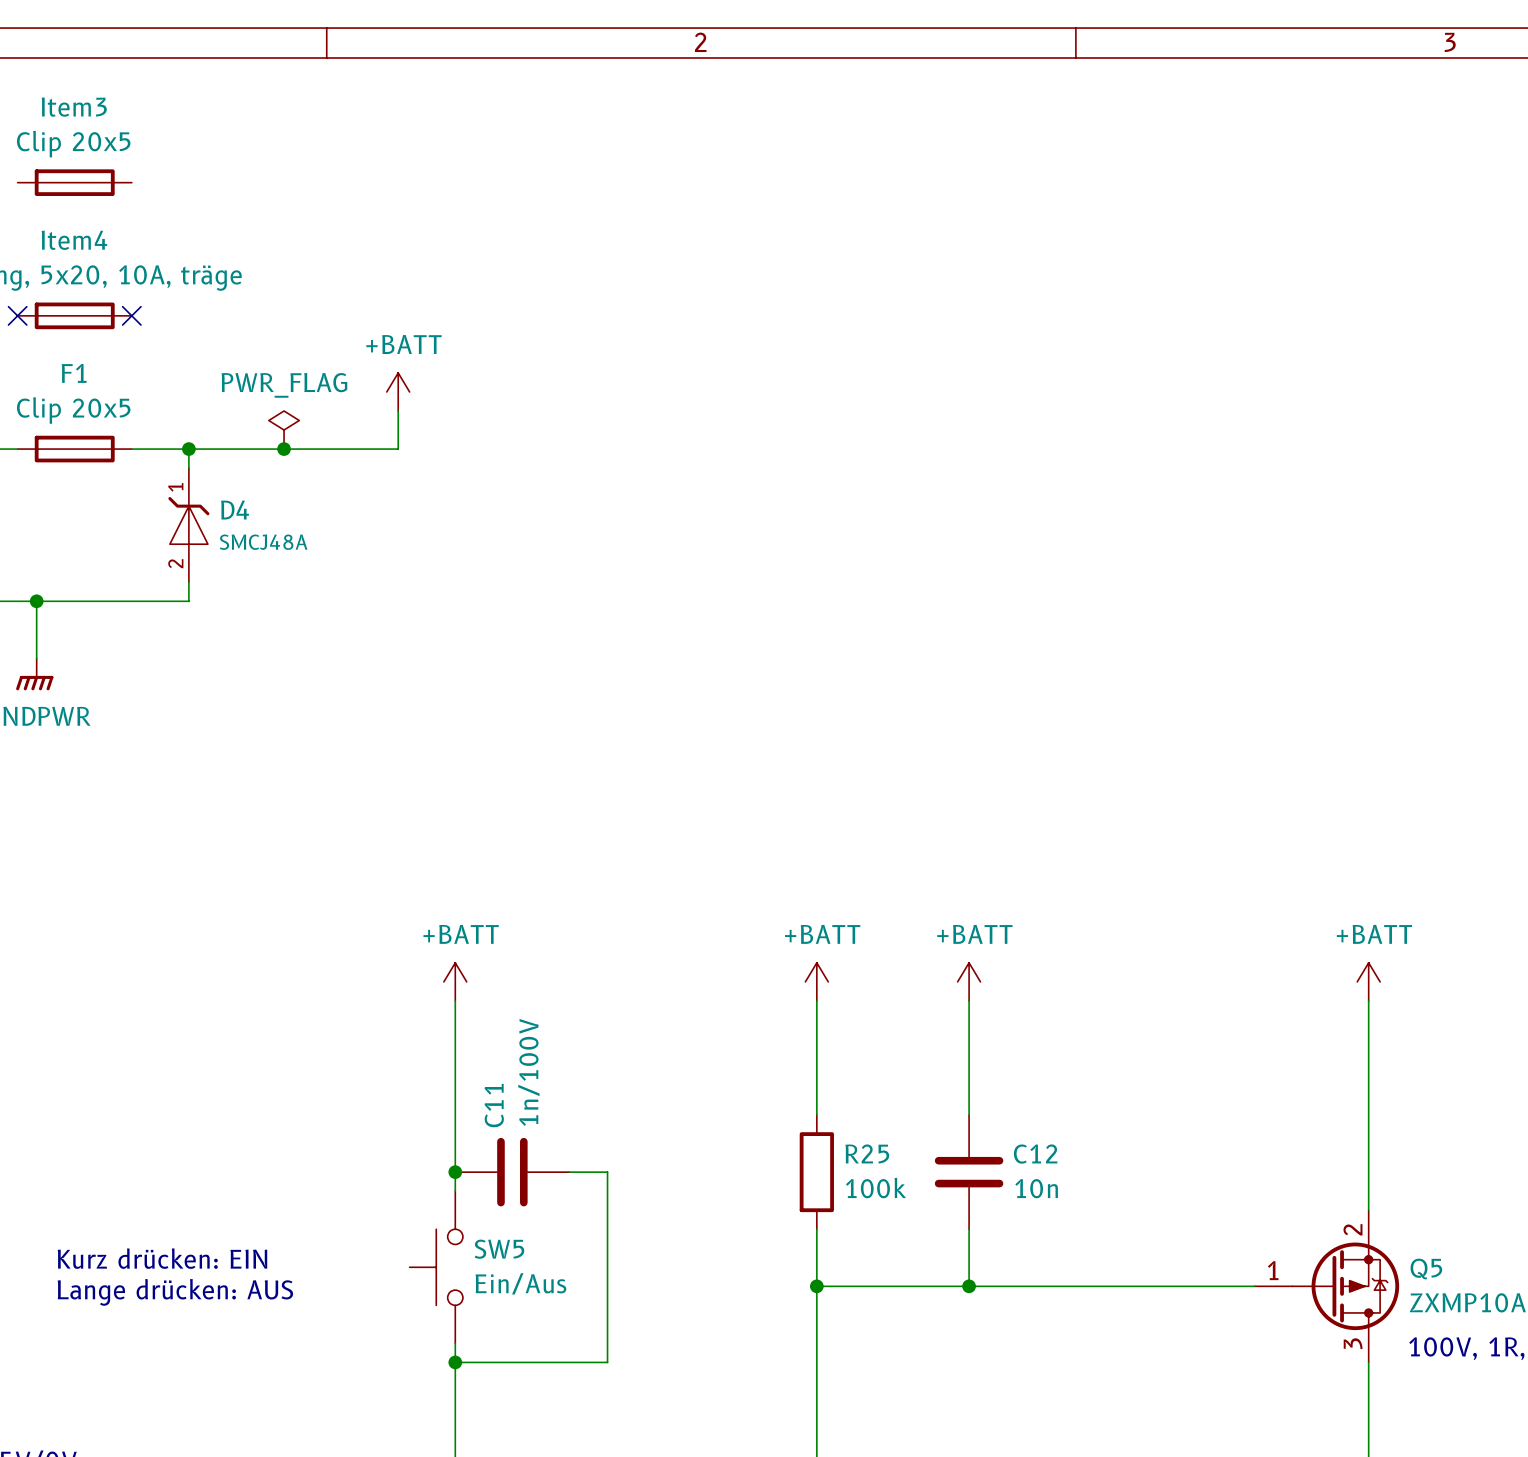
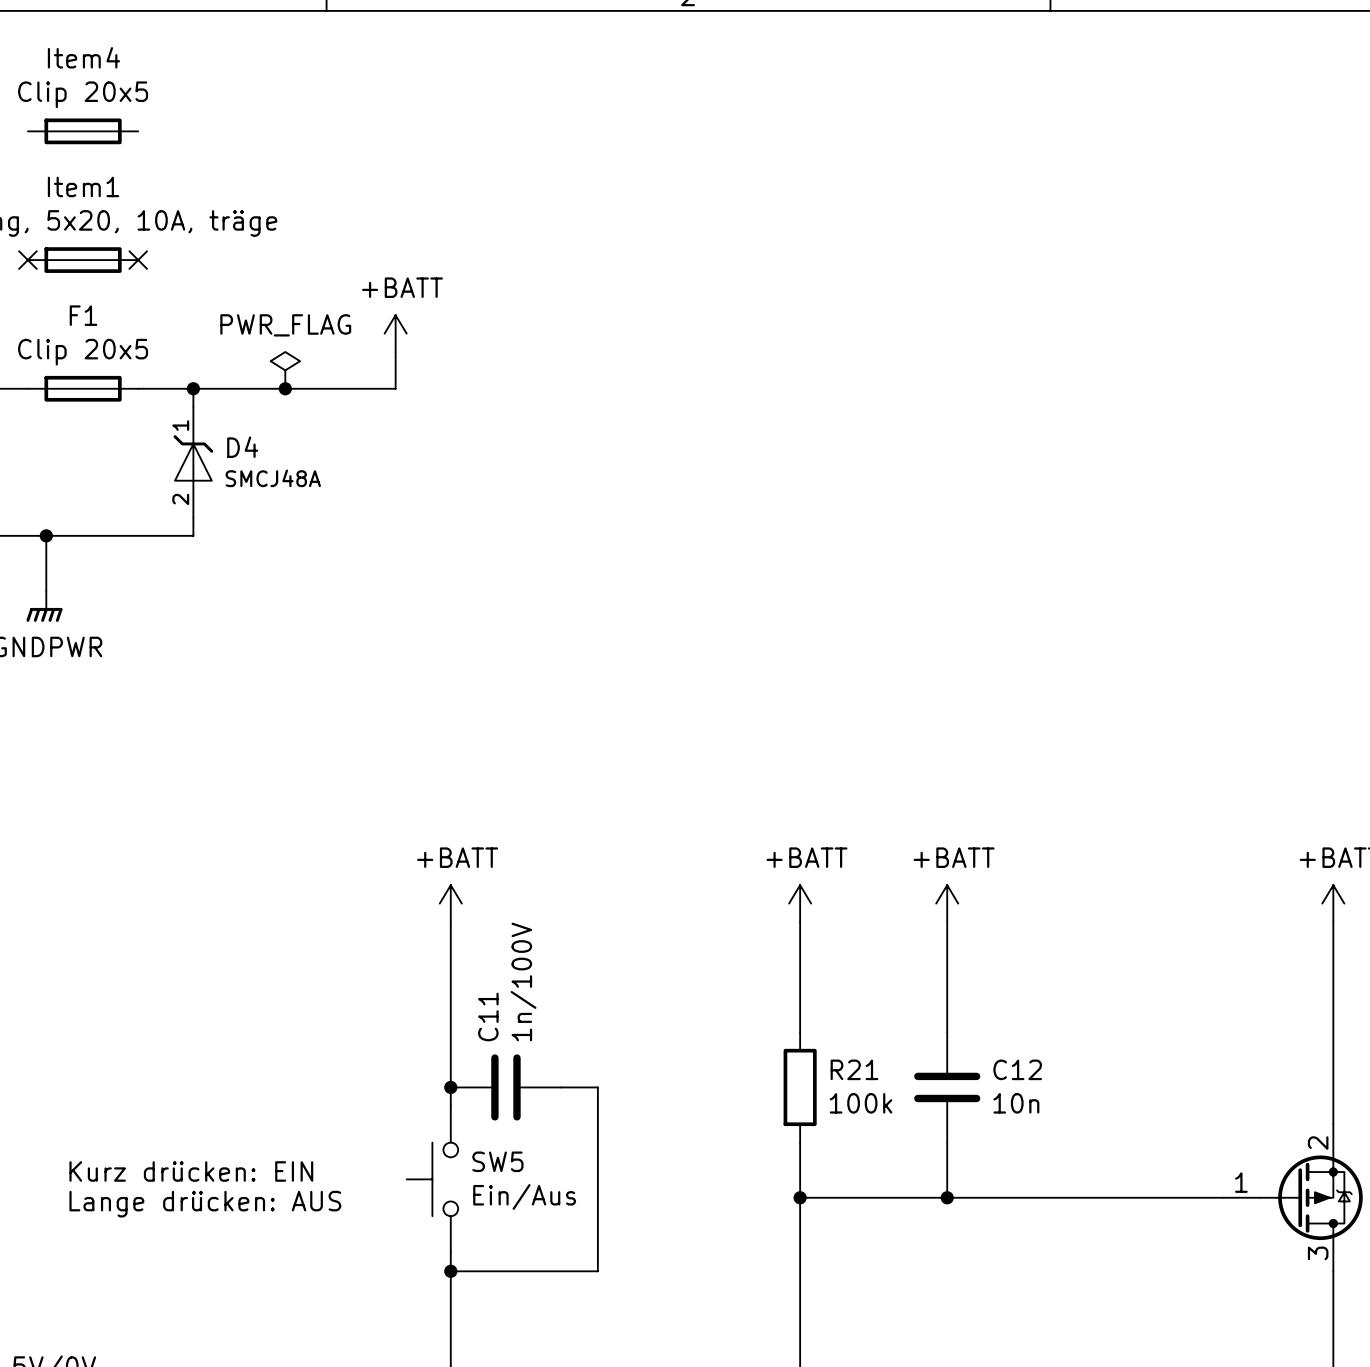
Item3 name: Item3 (74, 107) -> Item4 (83, 57)
Item4 name: Item4 (74, 240) -> Item1 (83, 186)
R25 name: R25 (867, 1153) -> R21 (854, 1069)

